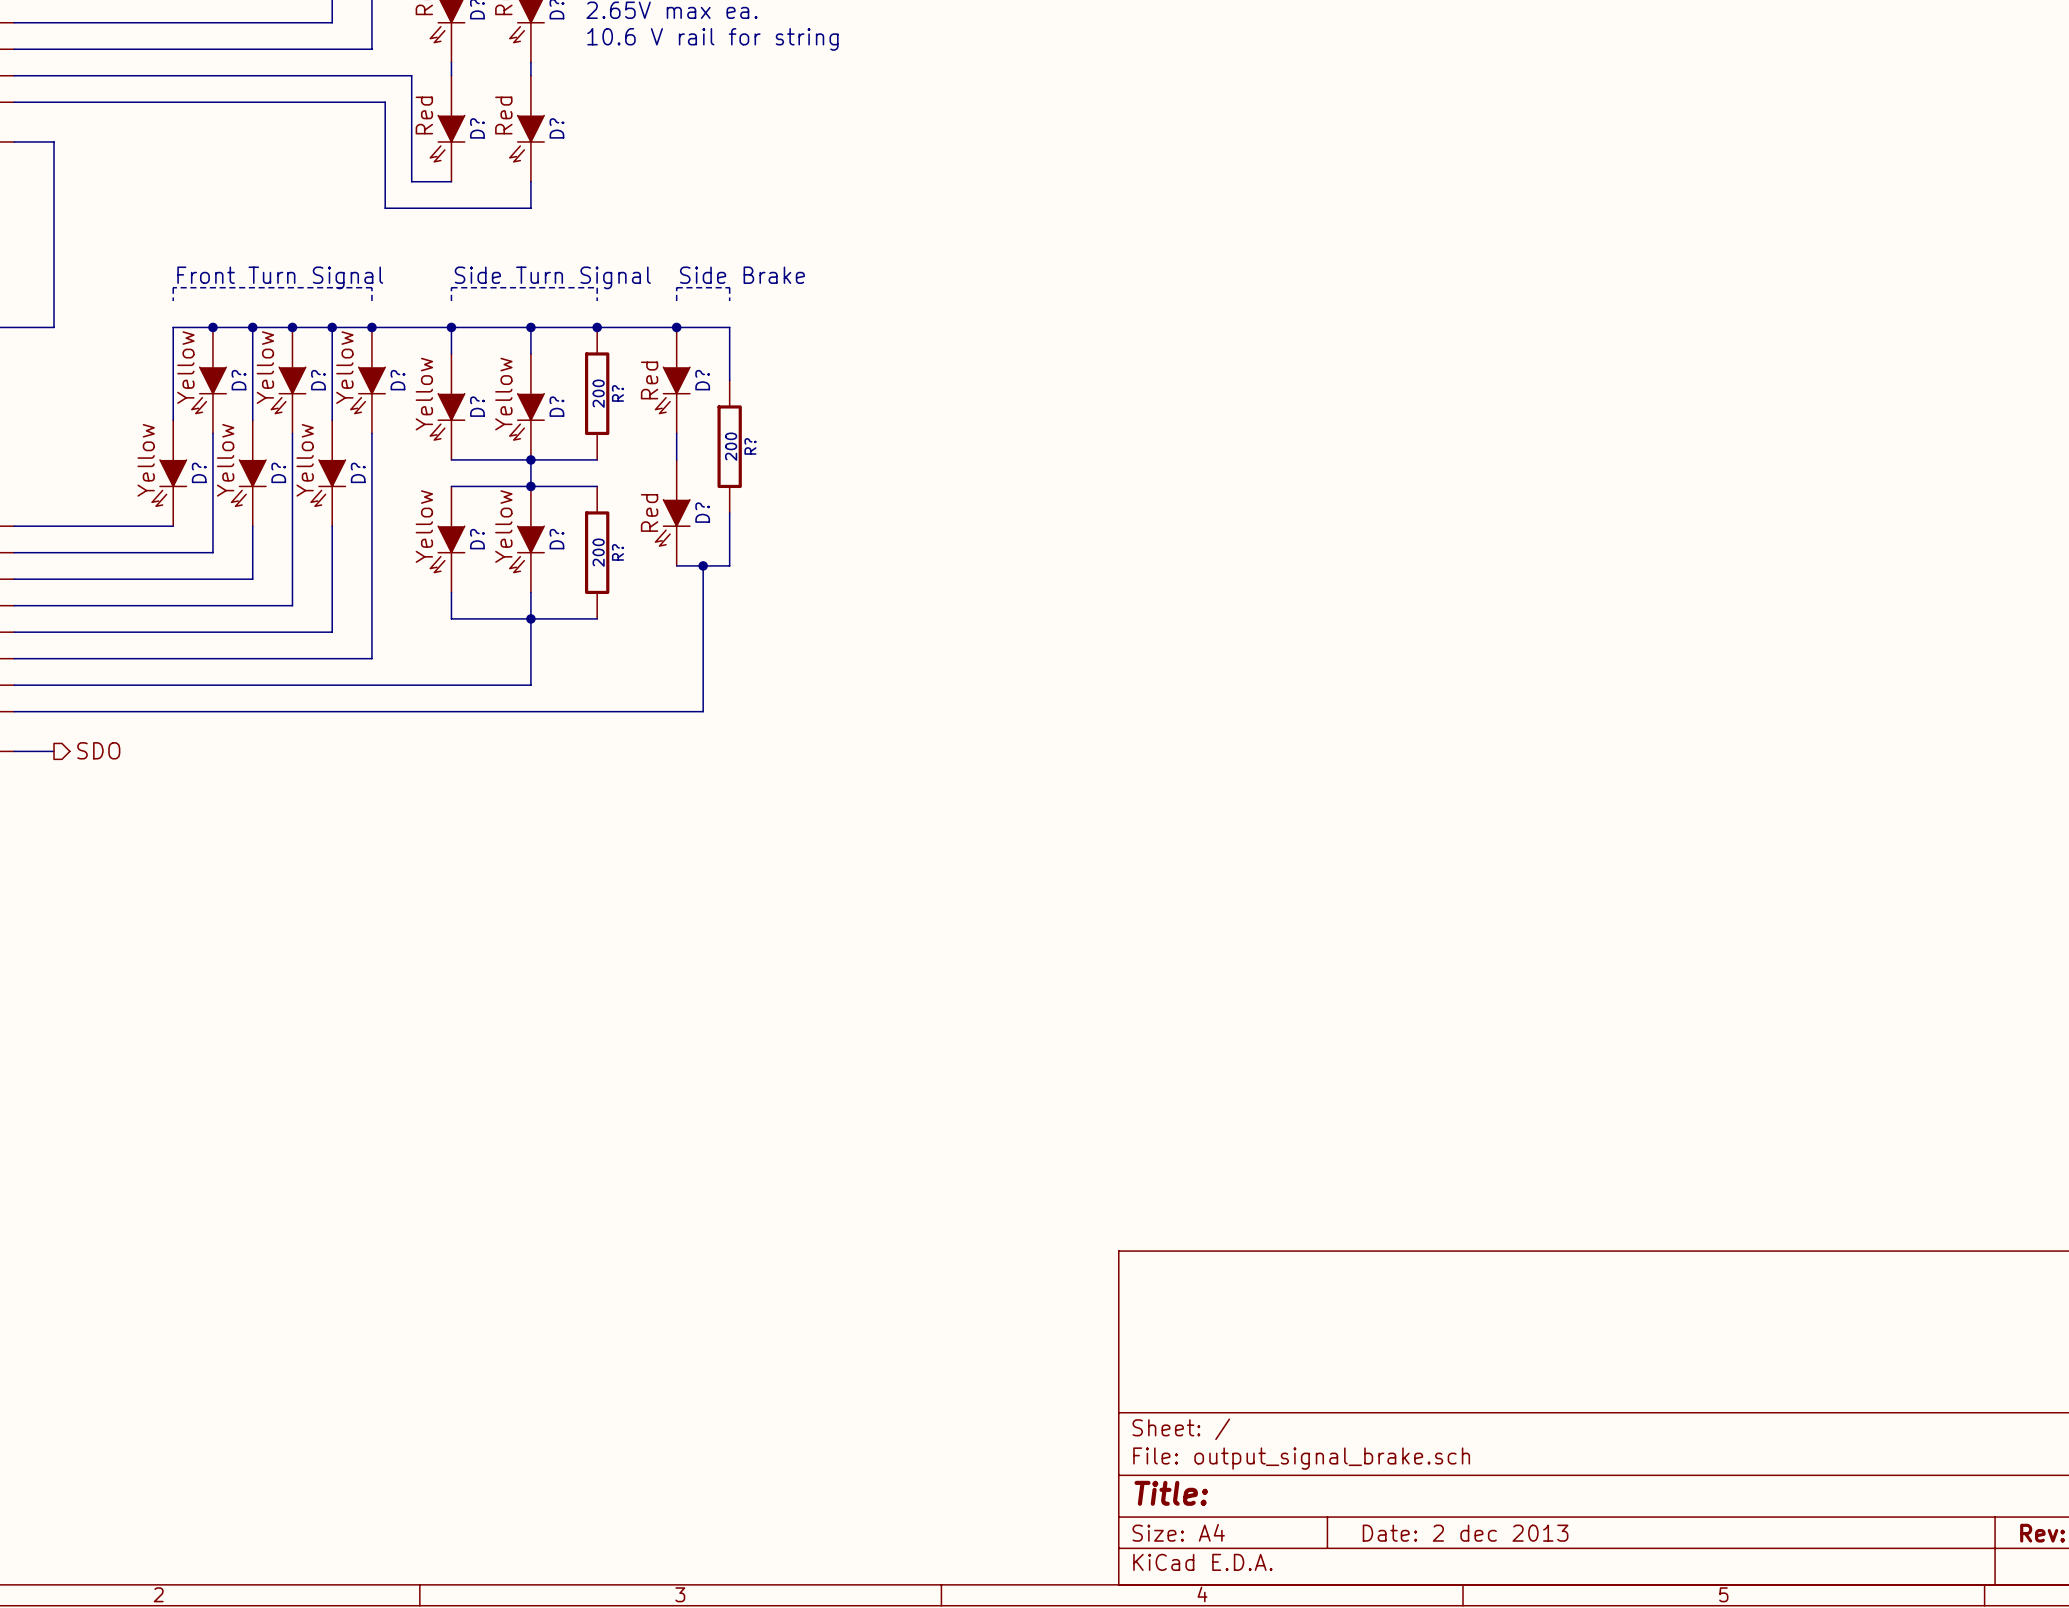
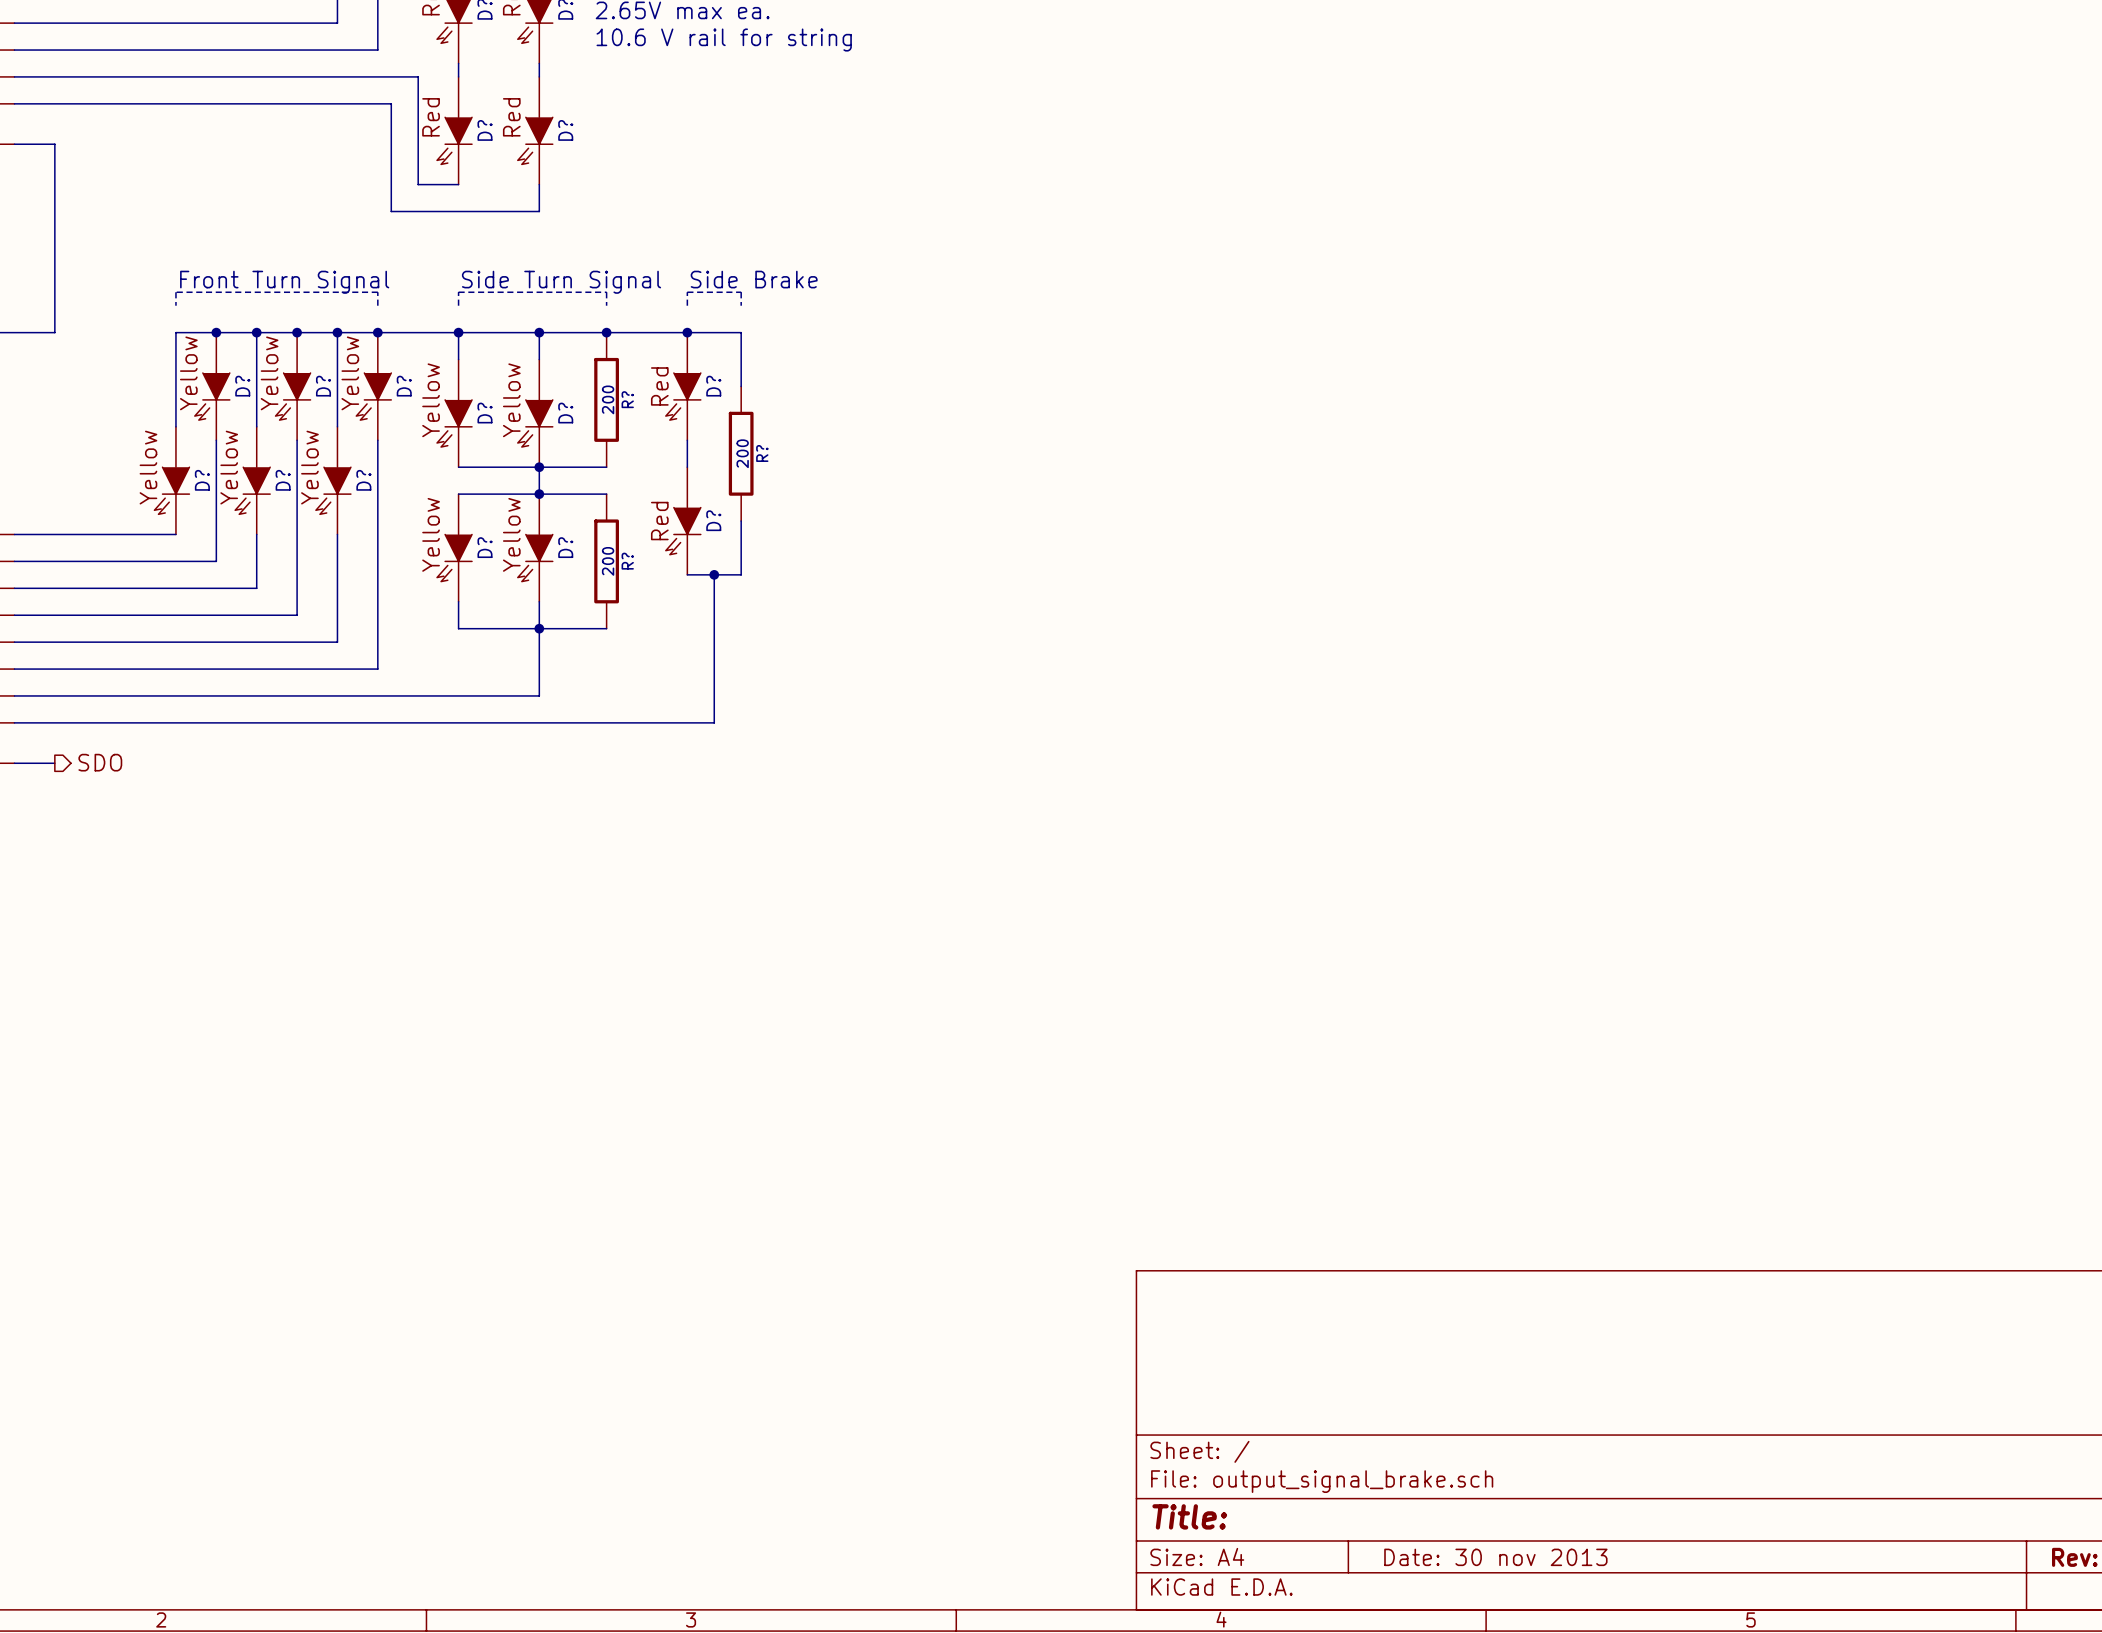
title block: Date: 2 dec 2013 (1465, 1533) -> Date: 30 nov 2013 (1495, 1557)

